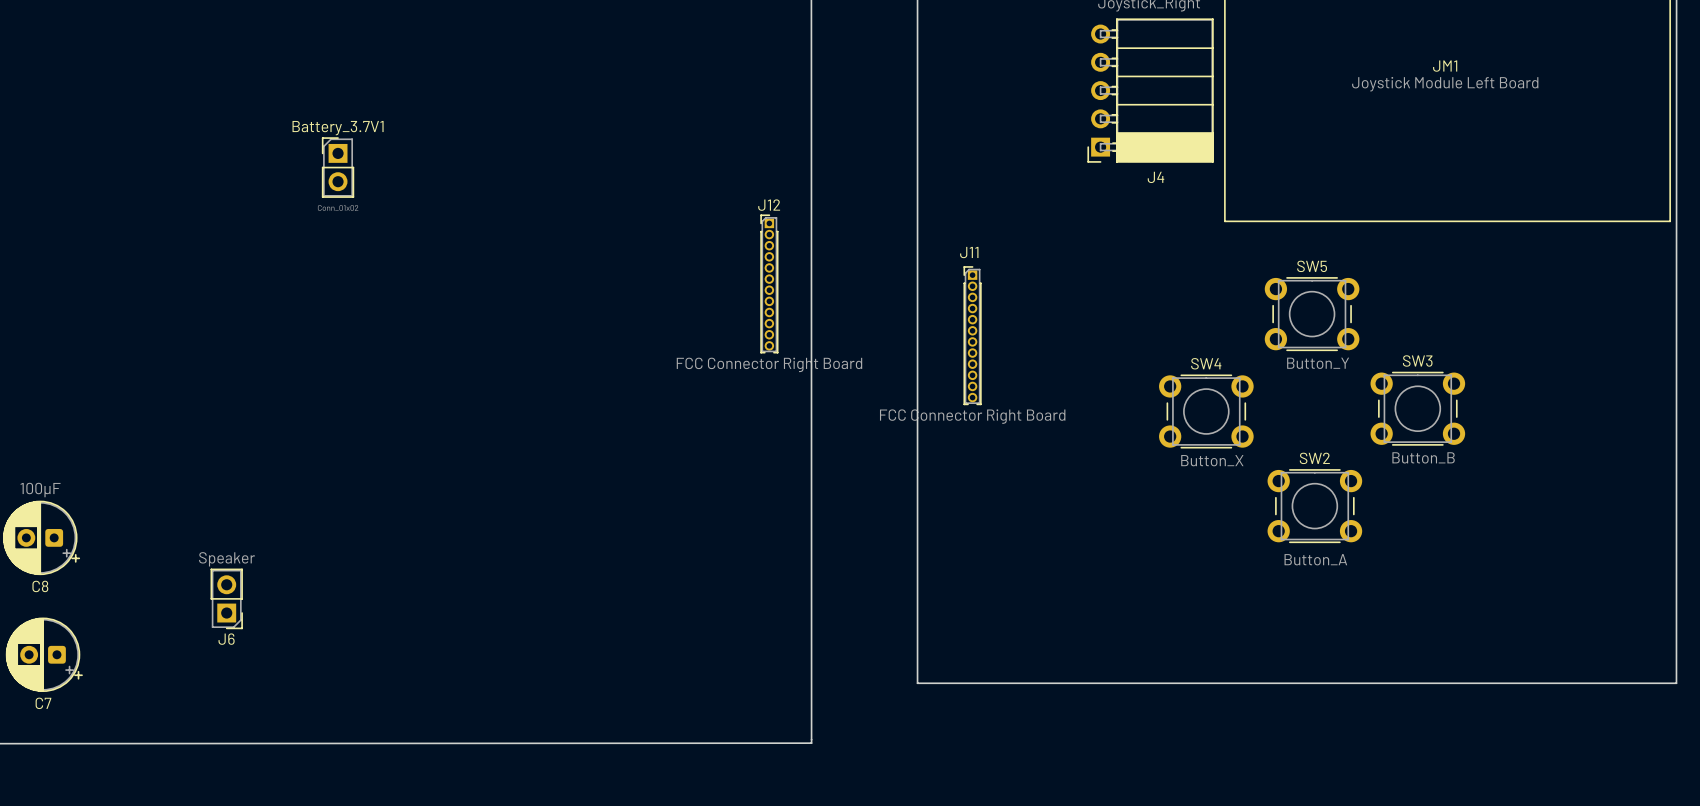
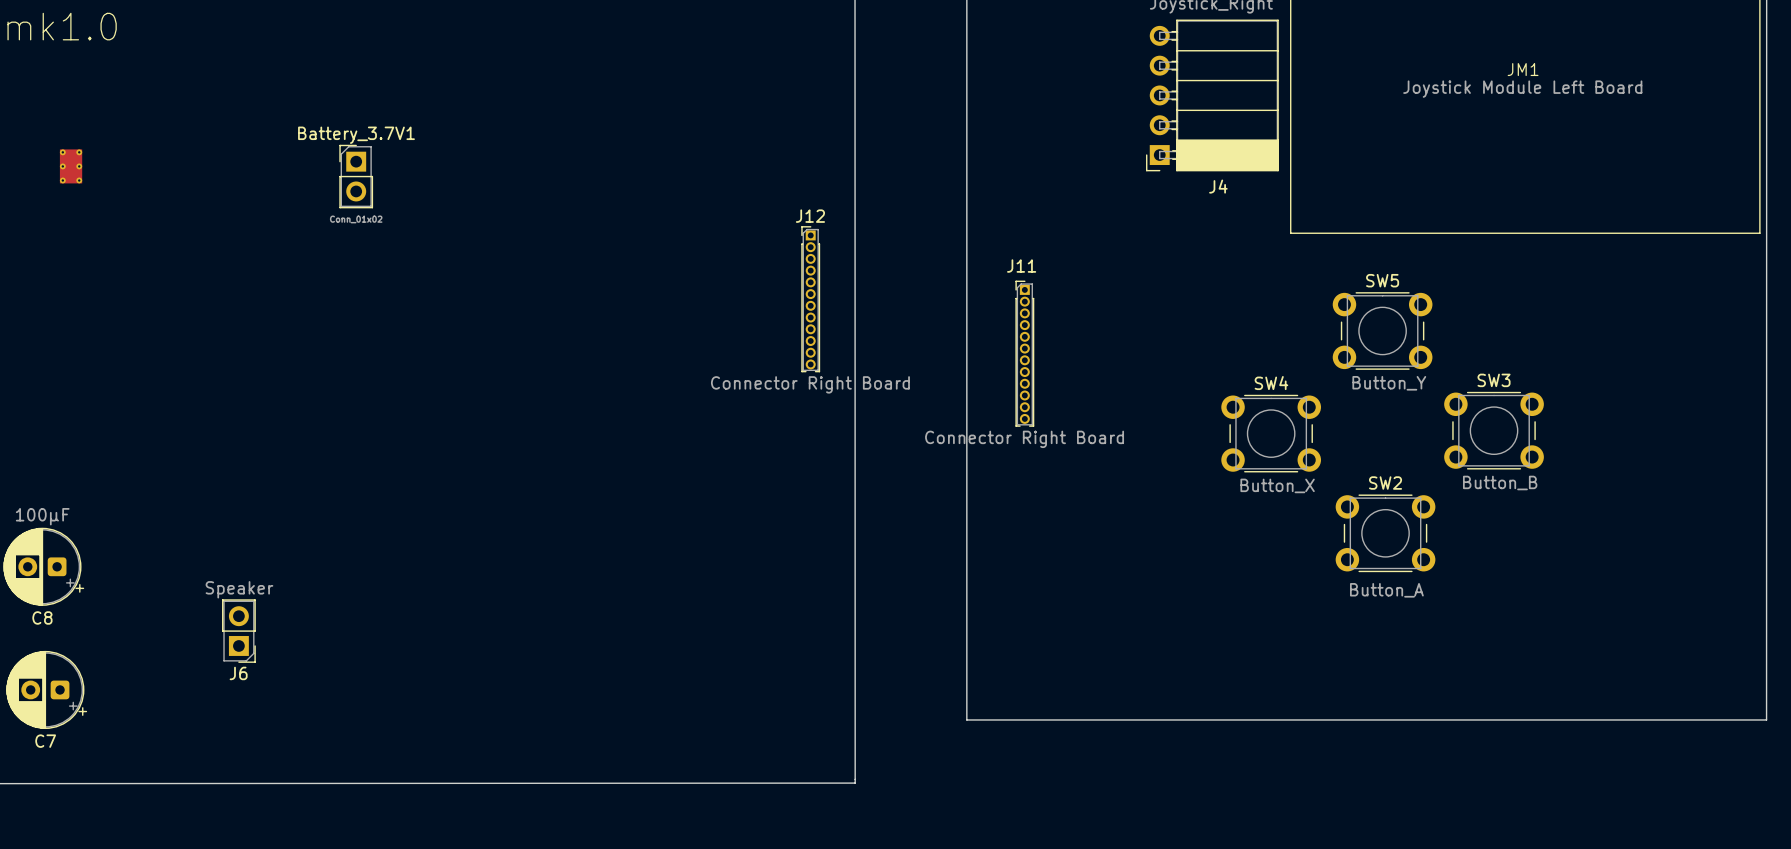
part: none -> (71, 166)
J12 value: FCC Connector Right Board (769, 364) -> Connector Right Board (810, 384)
J11 value: FCC Connector Right Board (972, 416) -> Connector Right Board (1024, 439)

